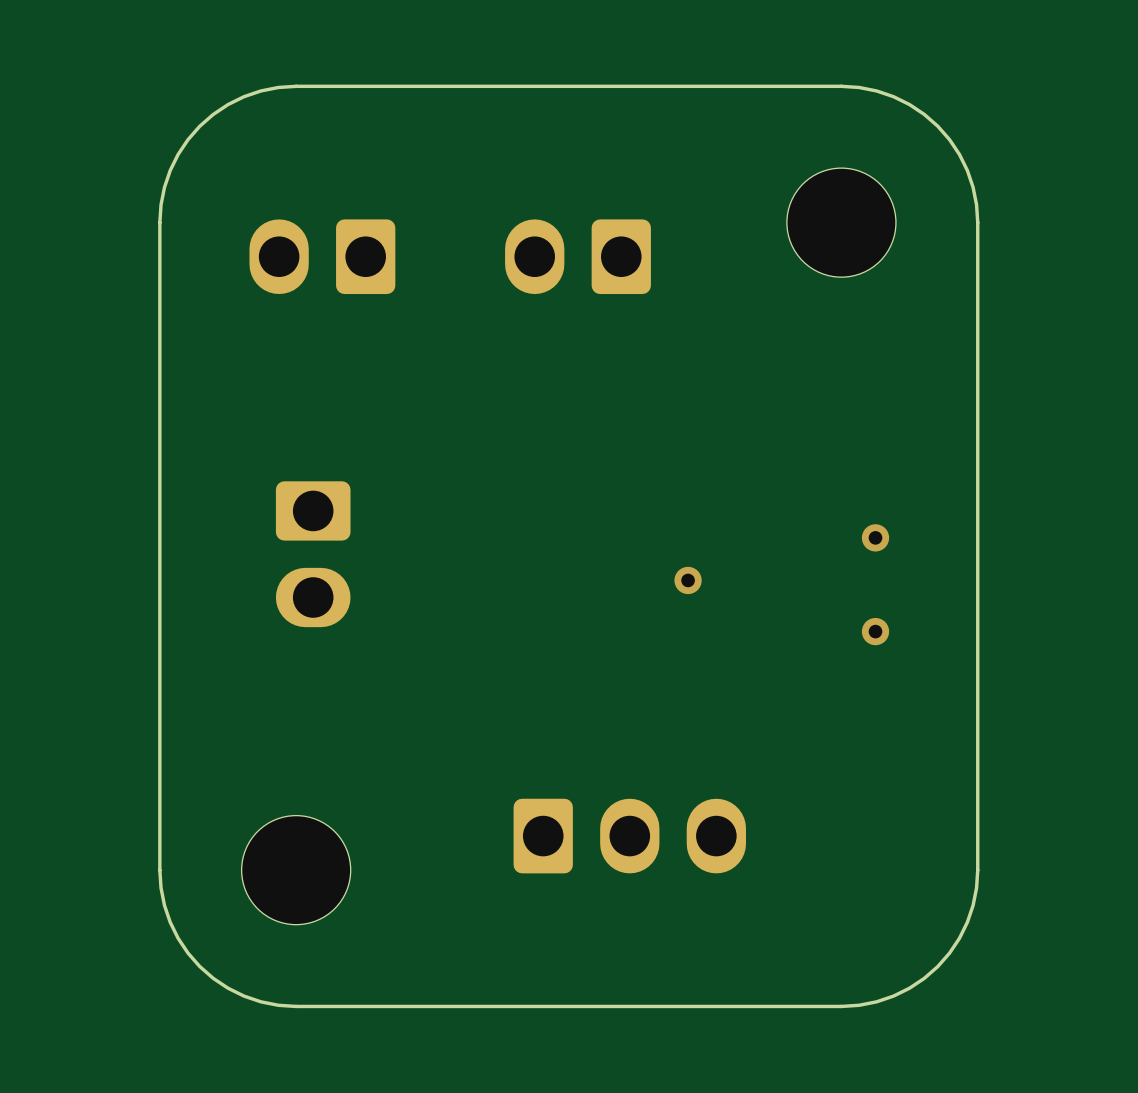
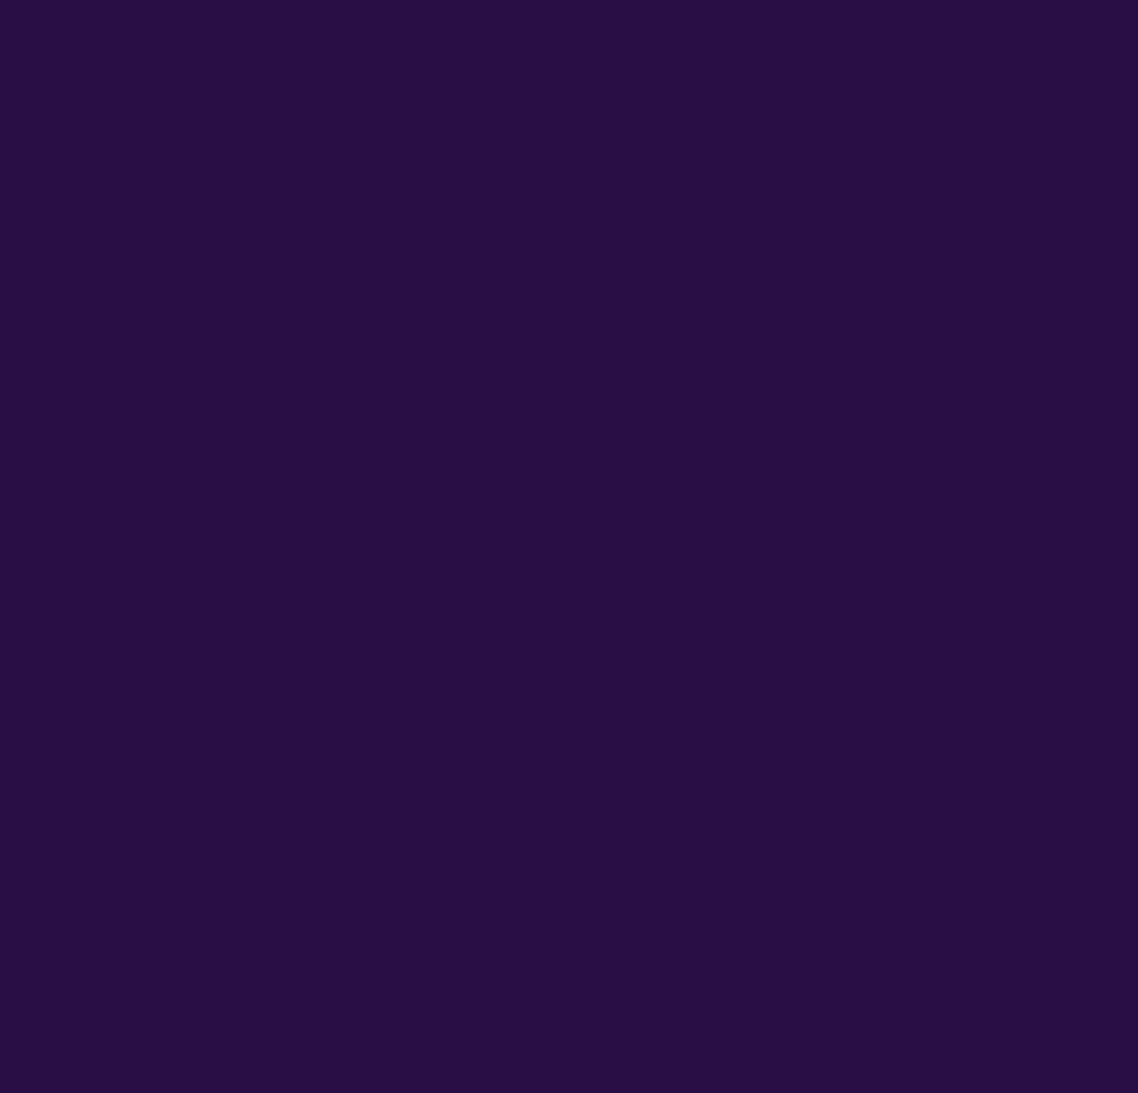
board edge: (841, 86) (278, 87) (260, 90) (228, 104) (199, 126) (188, 139) (170, 170) (164, 187) (159, 222) (159, 870) (161, 887) (170, 922) (188, 953) (213, 978) (244, 996) (260, 1001) (296, 1006) (841, 1006) (876, 1001) (909, 988) (924, 978) (949, 953) (967, 922) (973, 905) (977, 870) (976, 204) (967, 170) (949, 139) (937, 126) (909, 104) (893, 96) (876, 90) (841, 86) -> none
part: (841, 222) -> none
part: (322, 256) -> none
part: (578, 256) -> none
via: (875, 537) -> none
part: (313, 554) -> none
via: (688, 580) -> none
via: (875, 631) -> none
part: (629, 836) -> none
part: (296, 870) -> none

